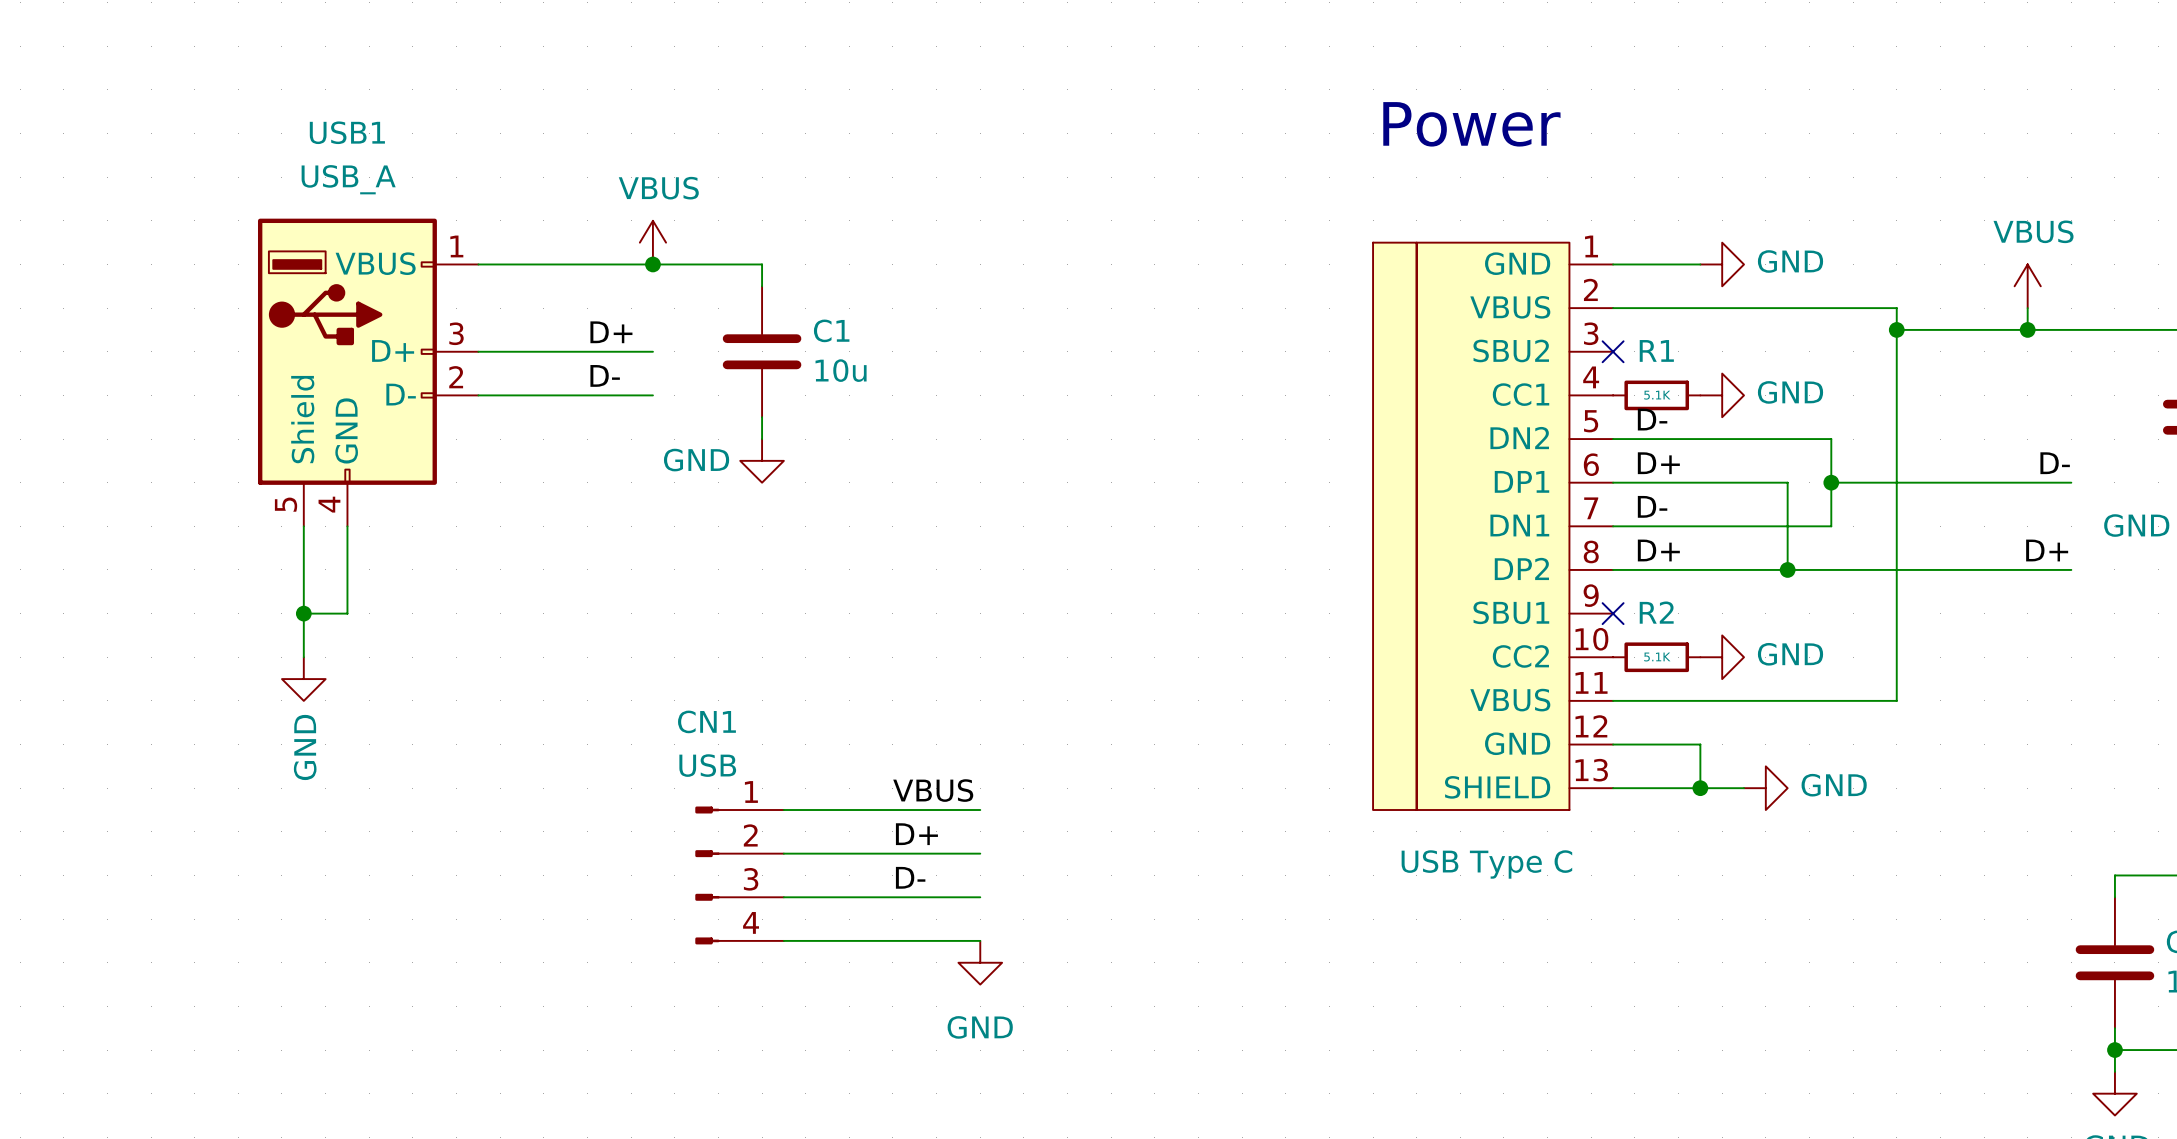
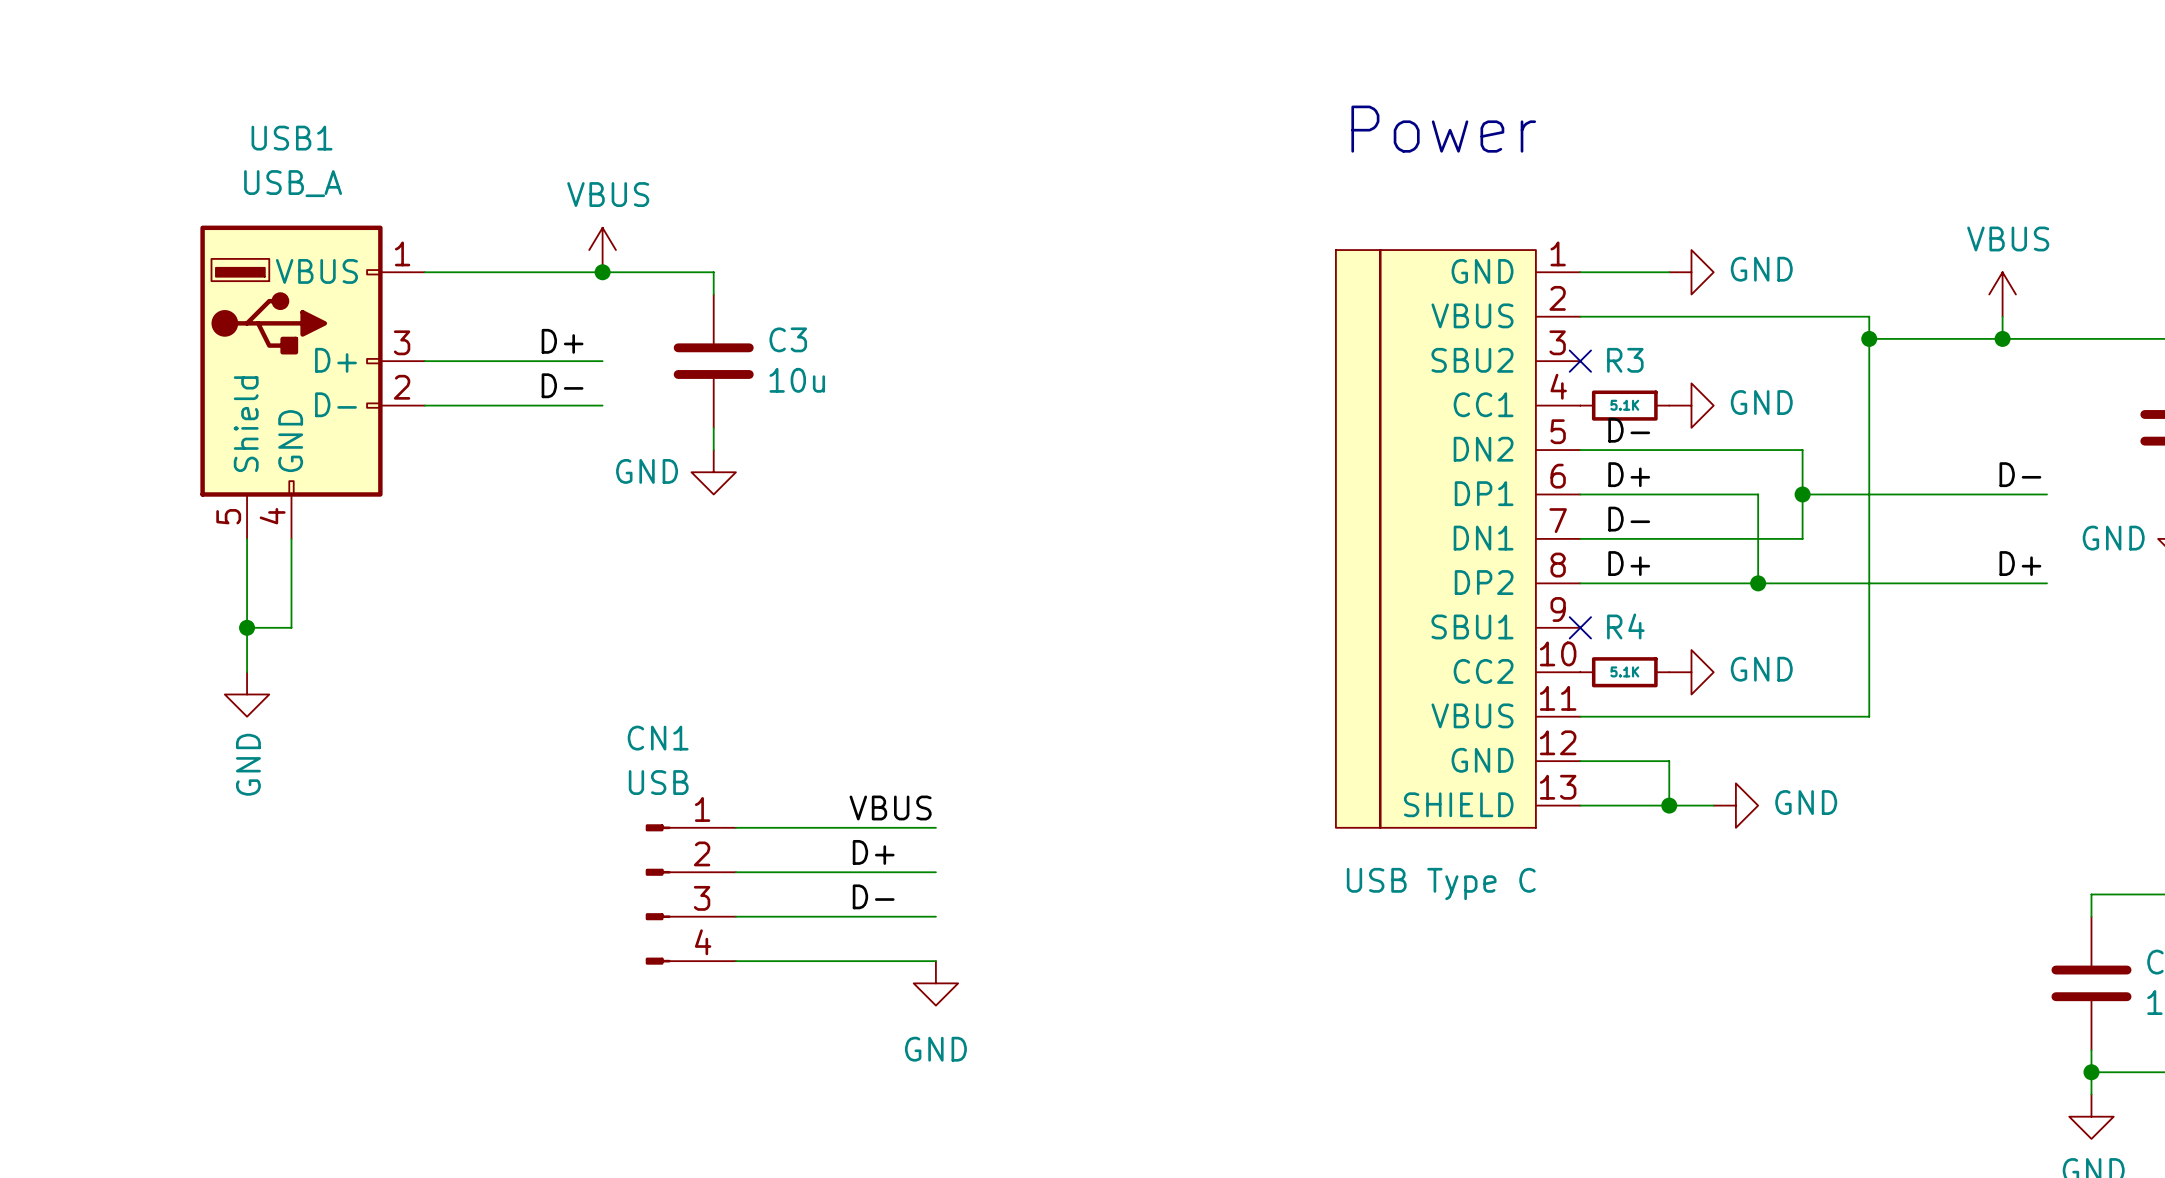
C1 name: C1 (831, 330) -> C3 (788, 339)
R1 name: R1 (1656, 350) -> R3 (1625, 360)
R2 name: R2 (1656, 612) -> R4 (1625, 626)

